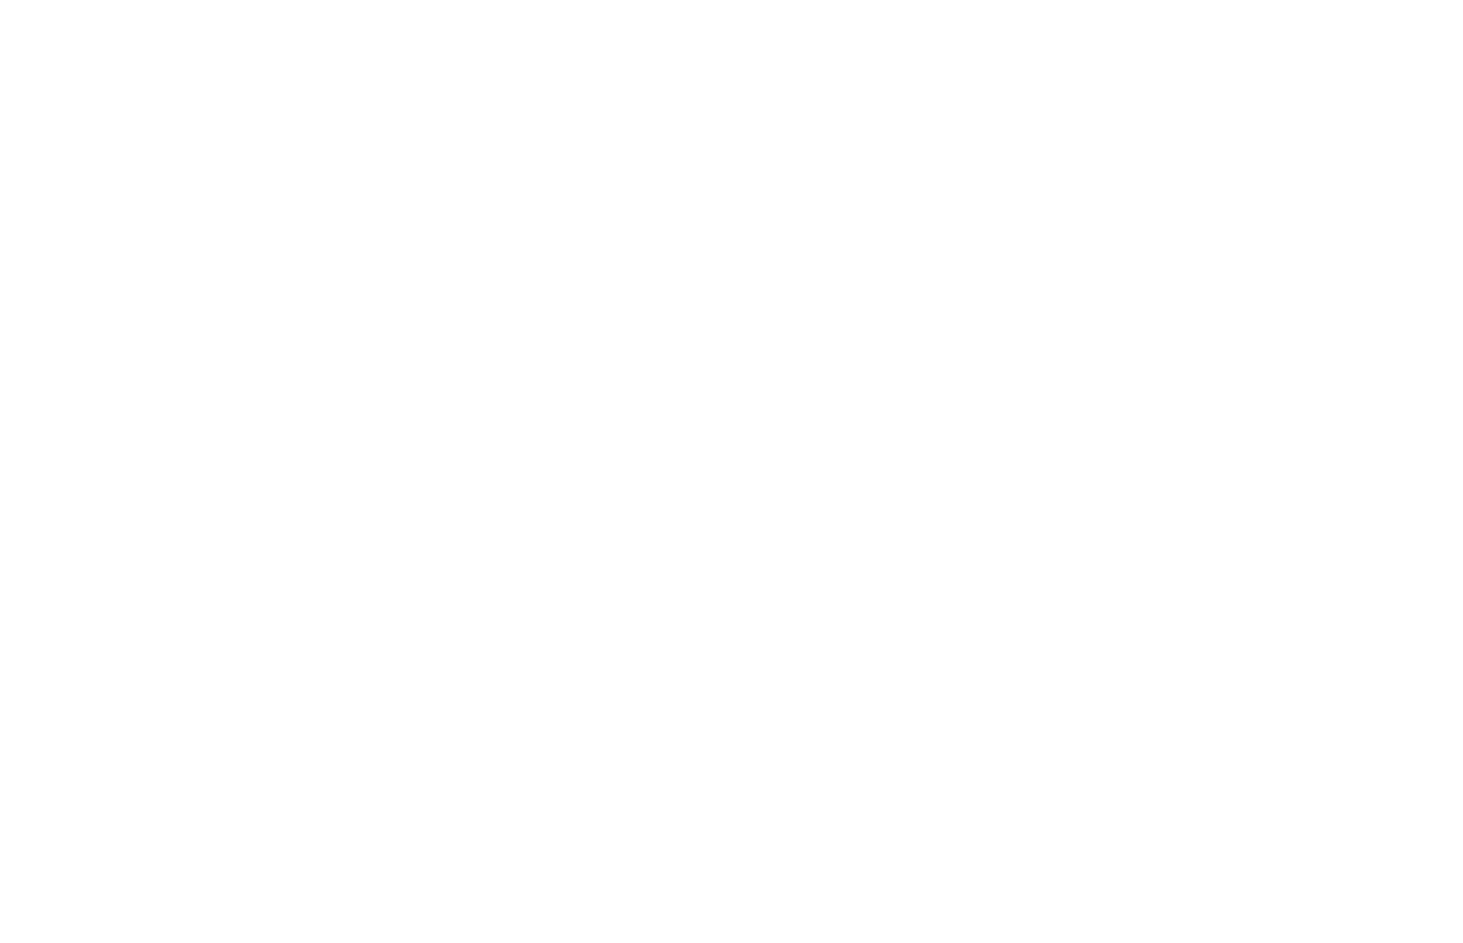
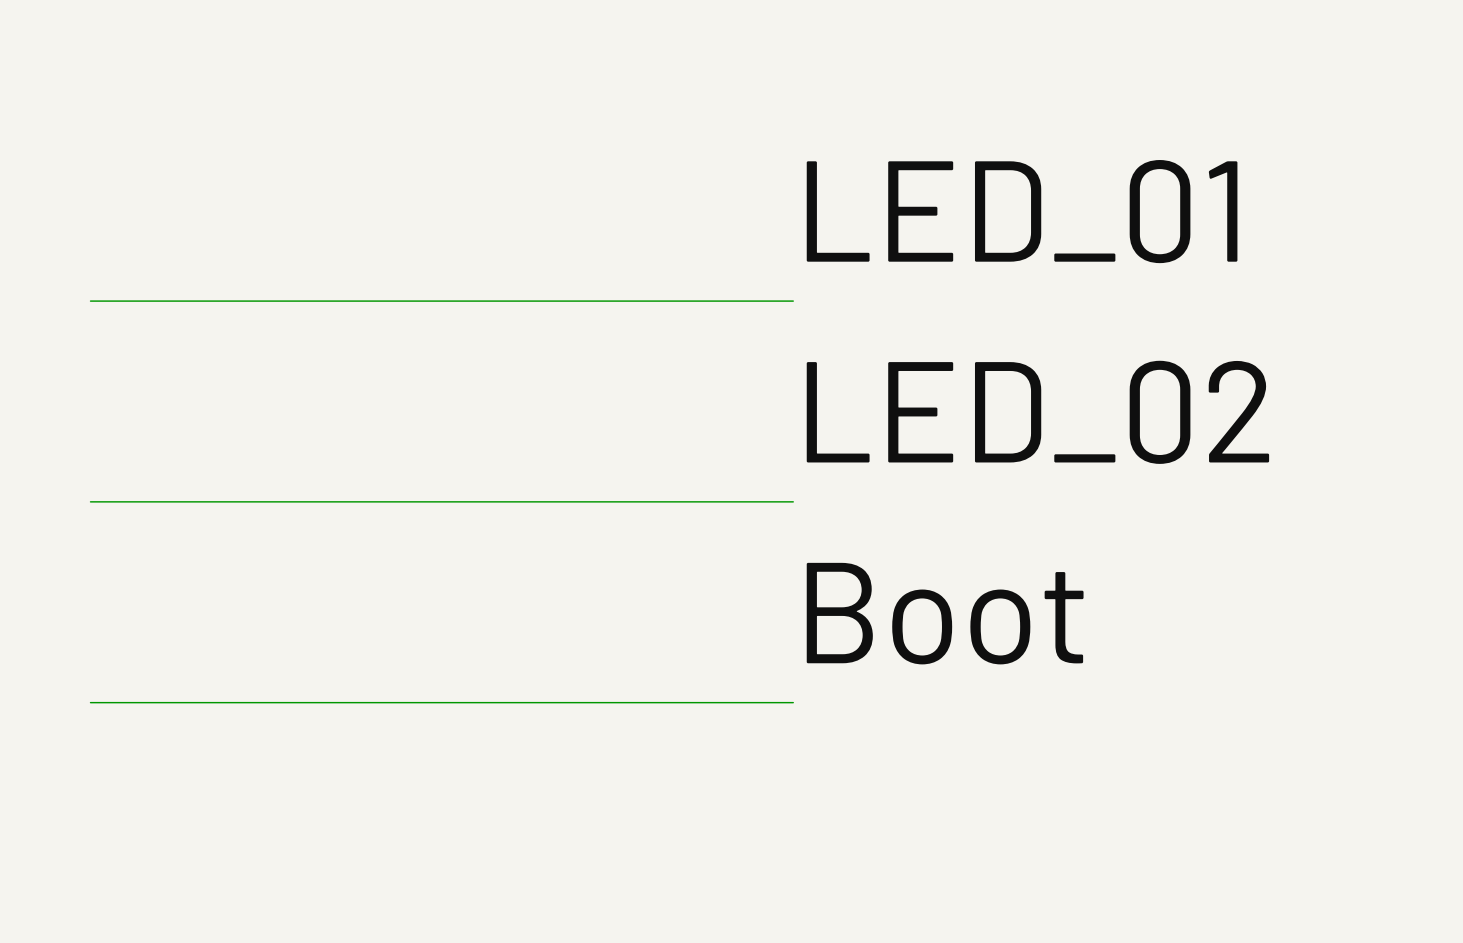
label: none -> LED_01 (1022, 211)
wire: none -> (90, 301) (793, 301)
label: none -> LED_02 (1037, 412)
wire: none -> (90, 501) (793, 501)
label: none -> Boot (945, 613)
wire: none -> (90, 702) (793, 702)

